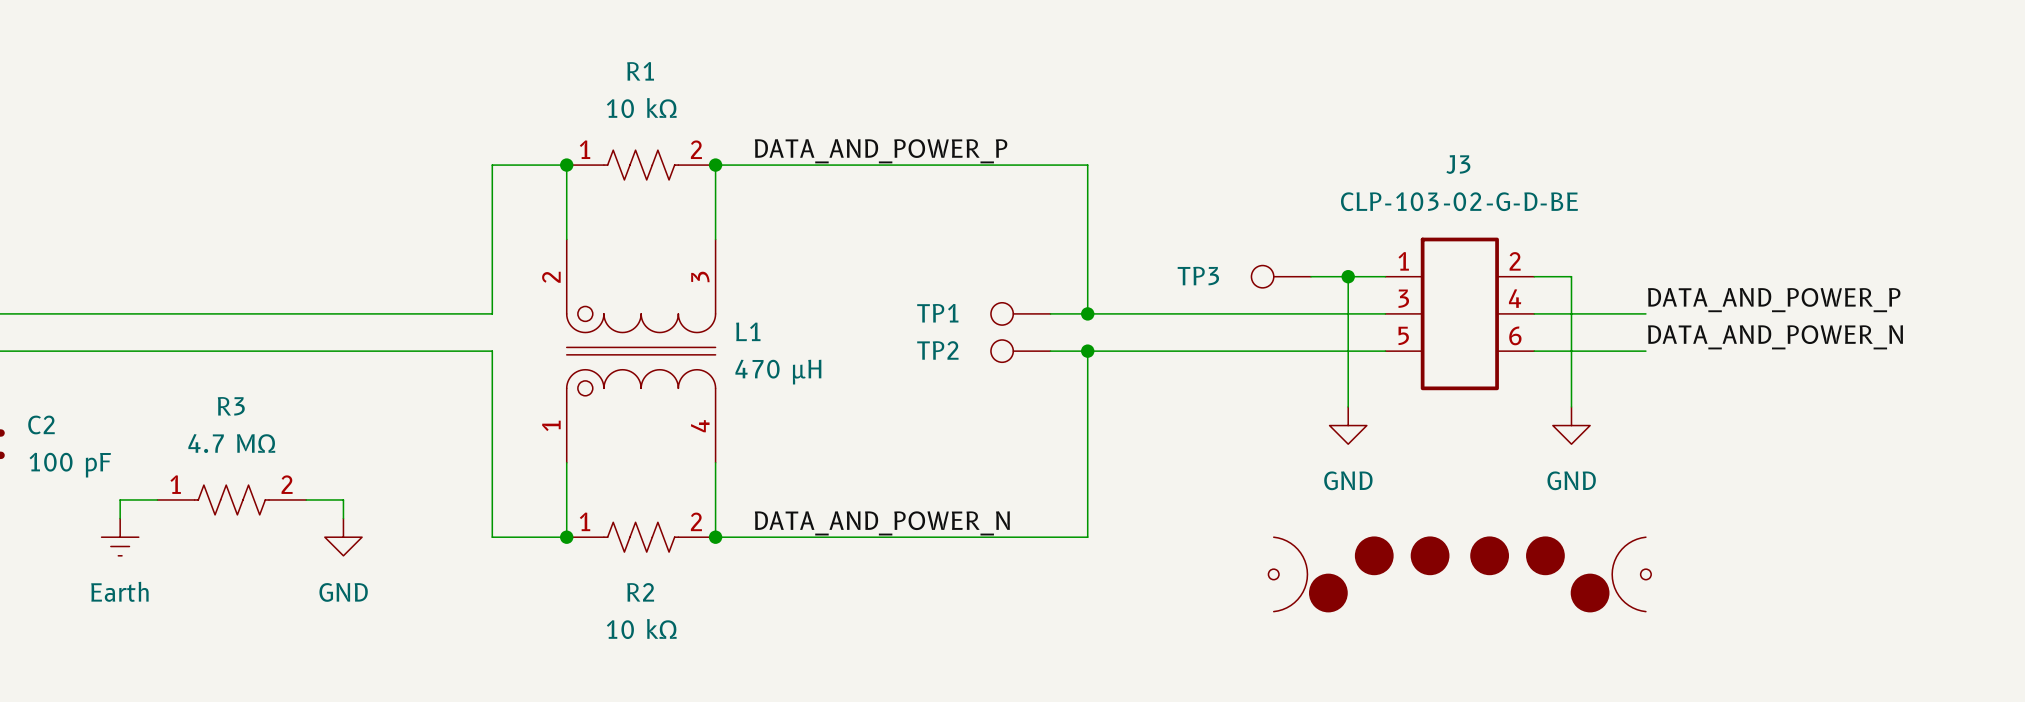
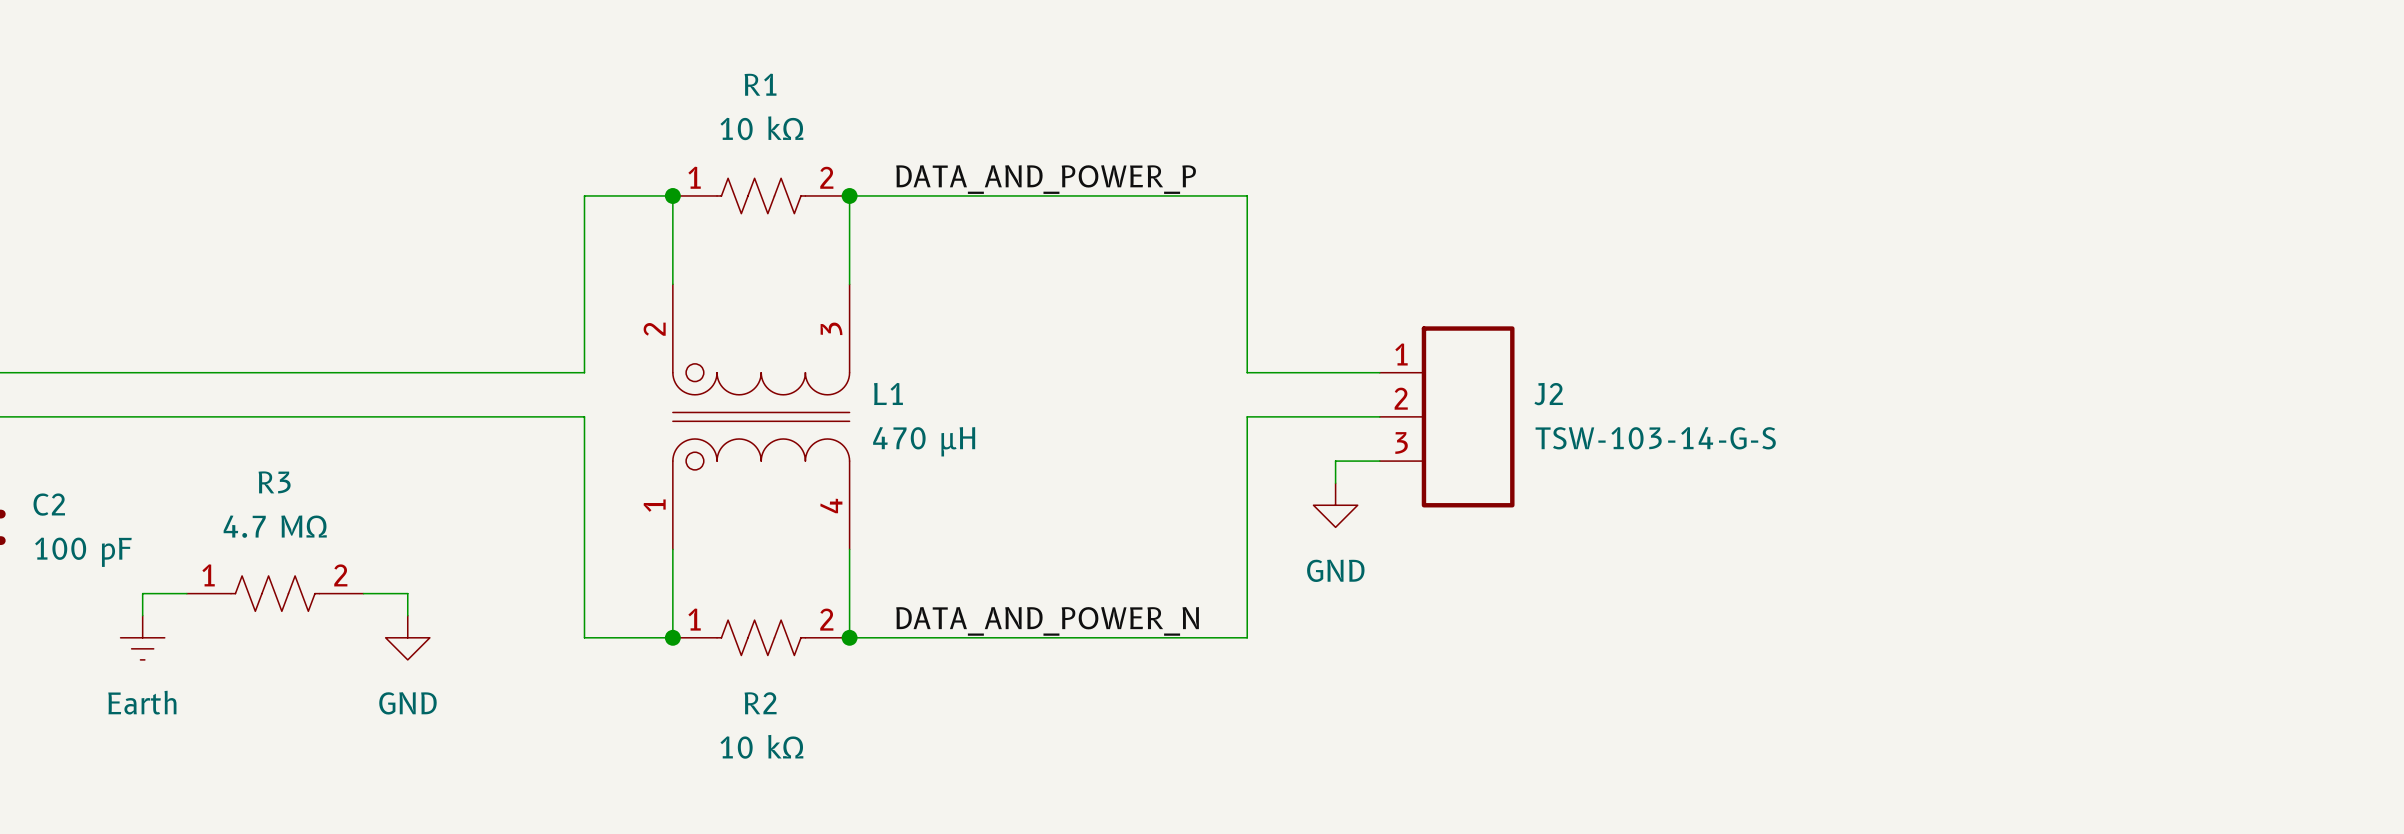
wire: (1050, 165) (1087, 165) (1087, 313) -> (1247, 195) (1247, 372)
TP3: (1281, 276) -> none
wire: (1310, 276) (1385, 276) -> none
wire: (1348, 276) (1348, 406) -> none
junction: (1348, 276) -> none
wire: (1534, 276) (1571, 276) (1571, 406) -> none
label: DATA_AND_POWER_P (1774, 300) -> none
TP1: (1020, 313) -> none
junction: (1087, 313) -> none
wire: (1162, 313) (1385, 313) -> none
J3: CLP-103-02-G-D-BE (1459, 313) -> none
wire: (1534, 313) (1645, 313) -> none
label: DATA_AND_POWER_N (1775, 337) -> none
TP2: (1020, 351) -> none
wire: (1087, 351) (1087, 537) (1050, 537) -> (1247, 416) (1247, 637)
junction: (1087, 351) -> none
wire: (1162, 351) (1385, 351) -> none
J2: none -> TSW-103-14-G-S (1447, 416)
wire: (1534, 351) (1645, 351) -> none
wire: none -> (1379, 461) (1335, 461) (1335, 483)
power symbol: none -> GND (1335, 505)
power symbol: GND (1348, 425) -> none
power symbol: GND (1571, 425) -> none
part: (1459, 574) -> none

